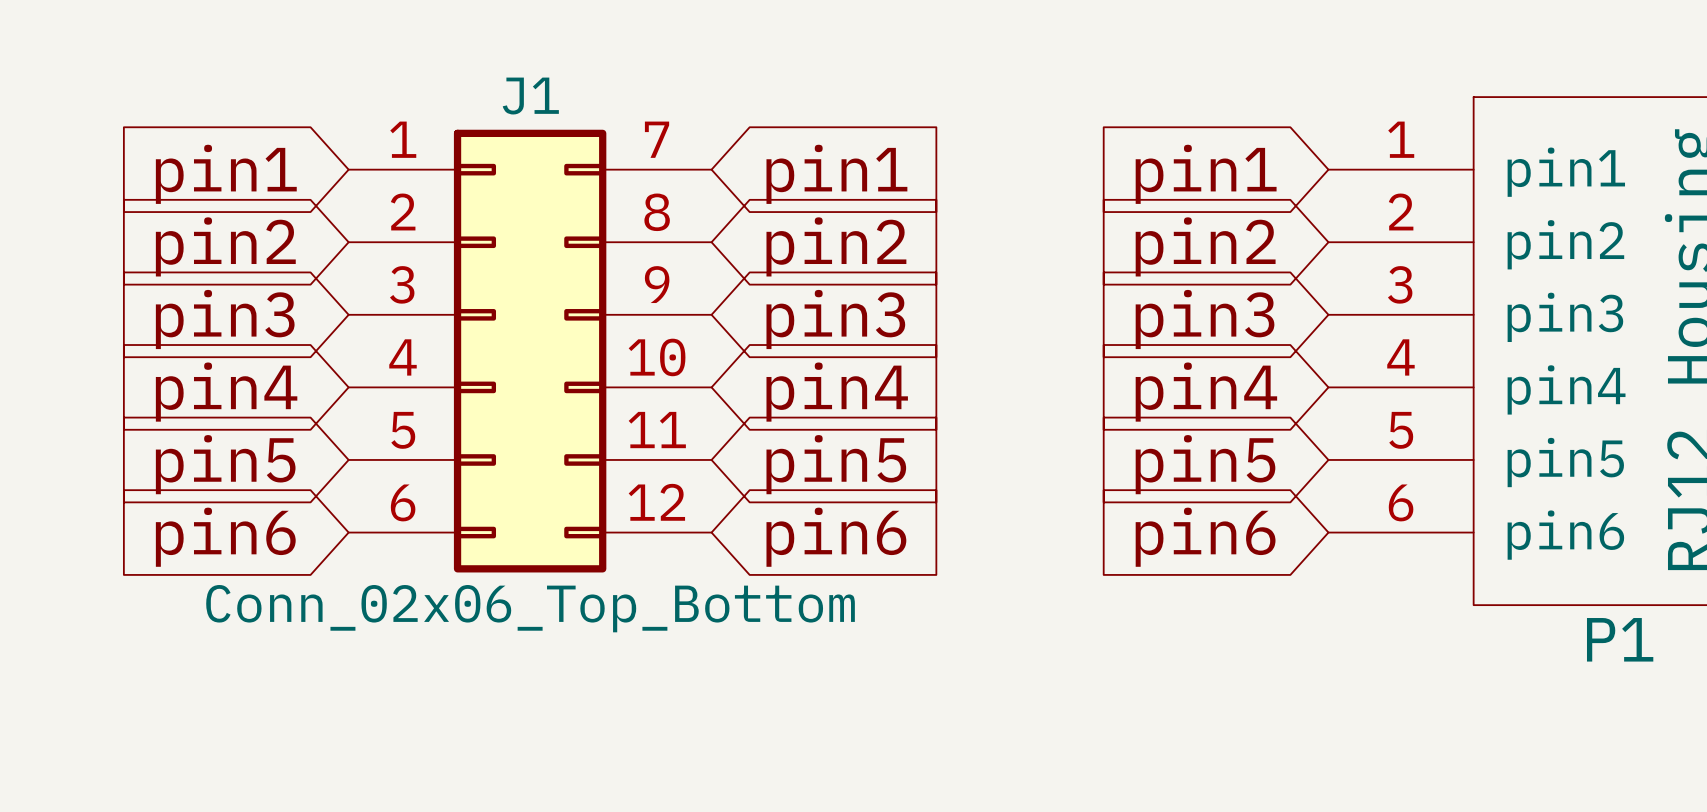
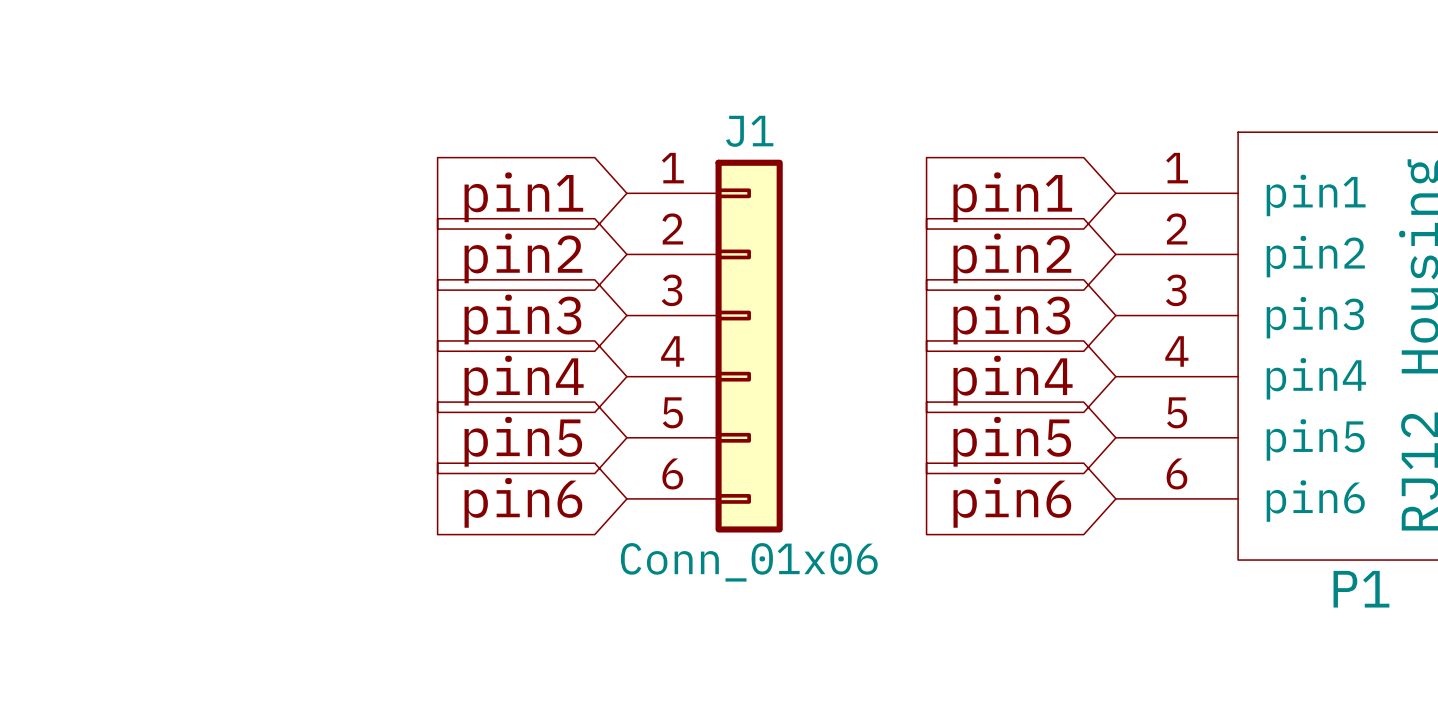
J1 symbol: [348, 129, 712, 573] -> [626, 159, 783, 533]
global label: pin1 (226, 174) -> none
global label rotation: 0° (836, 174) -> 180° (523, 197)
global label: pin2 (225, 246) -> none
global label rotation: 0° (836, 246) -> 180° (523, 258)
global label: pin3 (225, 319) -> none
global label rotation: 0° (835, 319) -> 180° (522, 319)
global label: pin4 (226, 392) -> none
global label rotation: 0° (837, 392) -> 180° (524, 380)
global label: pin5 (225, 464) -> none
global label rotation: 0° (836, 464) -> 180° (523, 441)
global label: pin6 (225, 537) -> none
global label rotation: 0° (836, 537) -> 180° (523, 502)
J1 value: Conn_02x06_Top_Bottom (530, 608) -> Conn_01x06 (749, 562)

